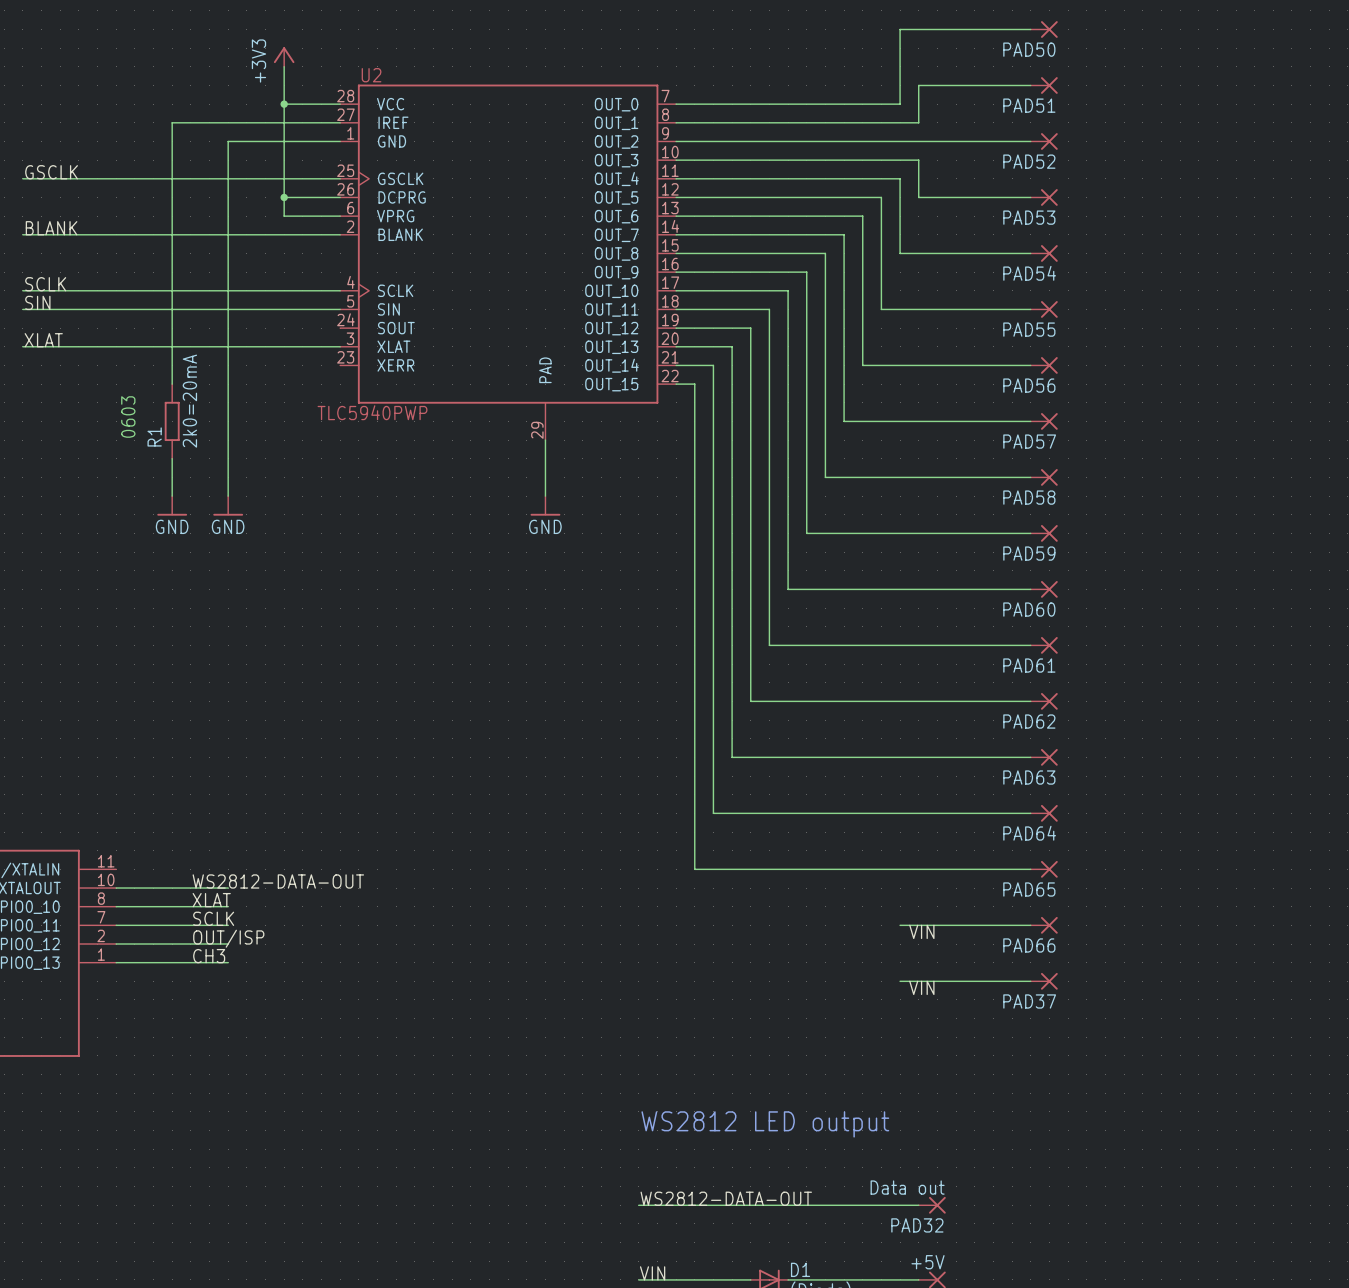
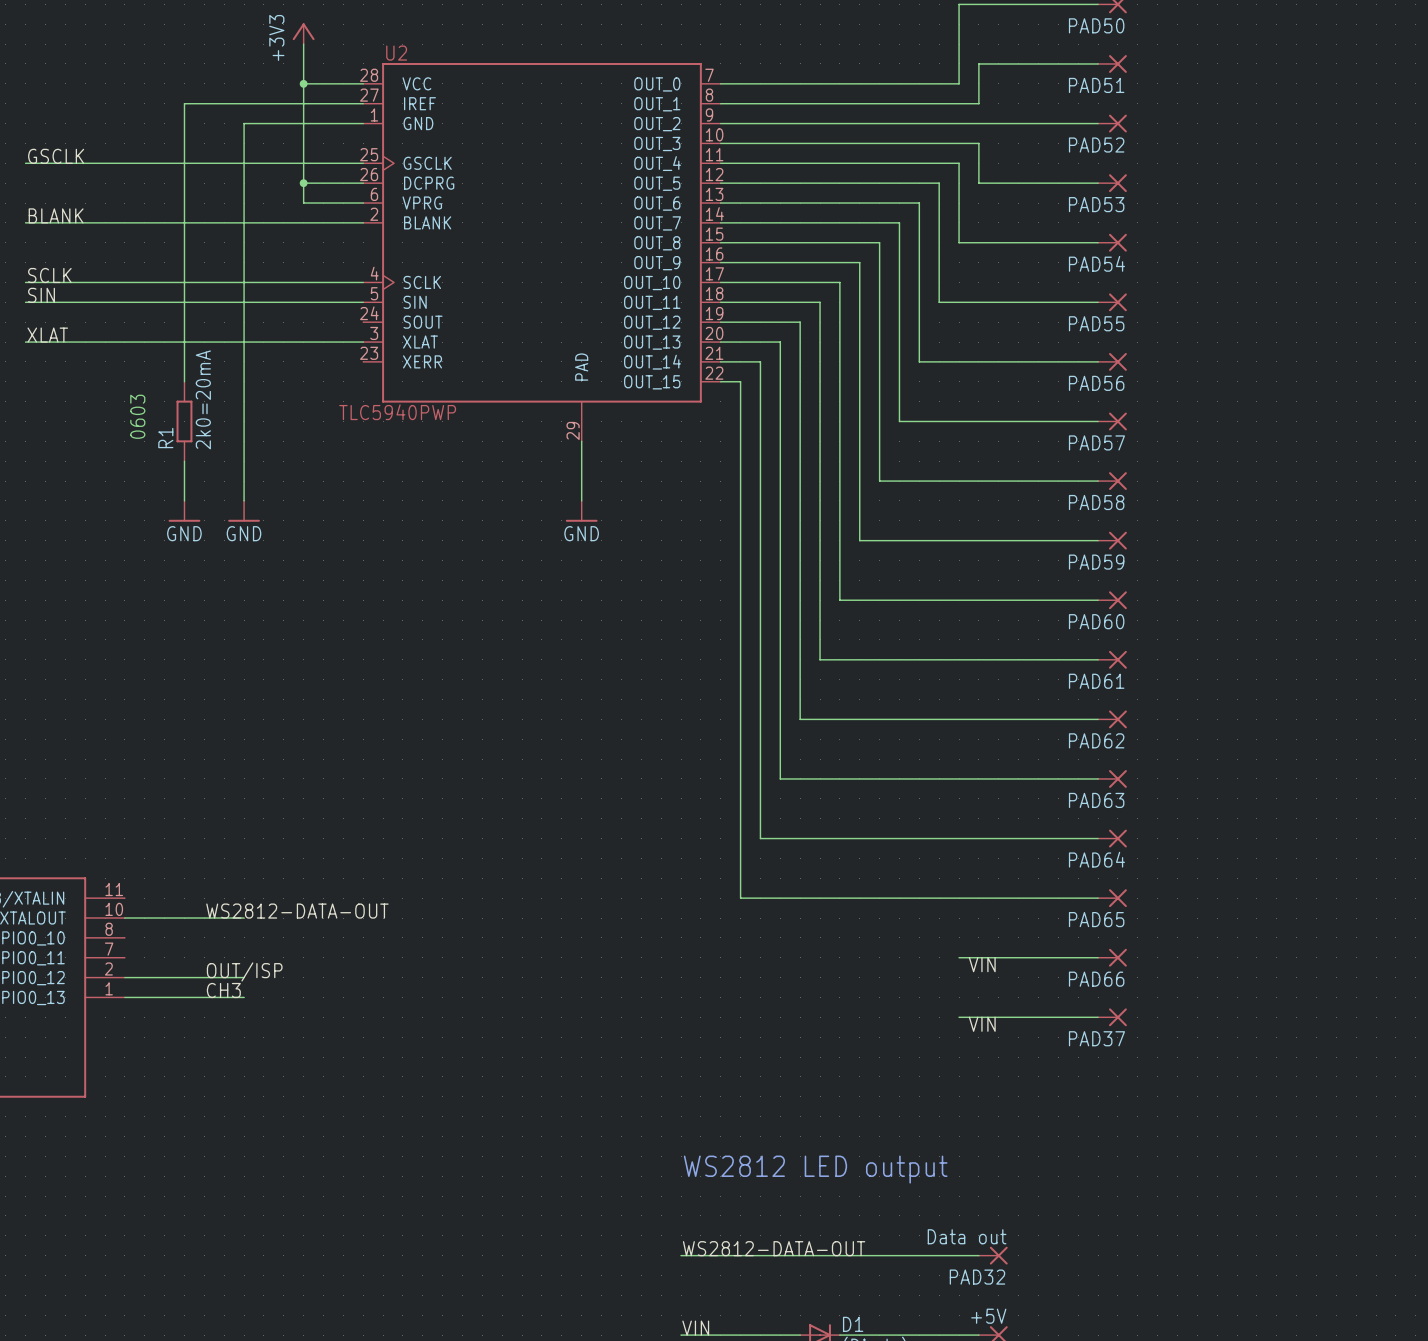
label: XLAT (211, 900) -> none
wire: (116, 906) (228, 906) -> none
label: SCLK (213, 918) -> none
wire: (116, 925) (228, 925) -> none

